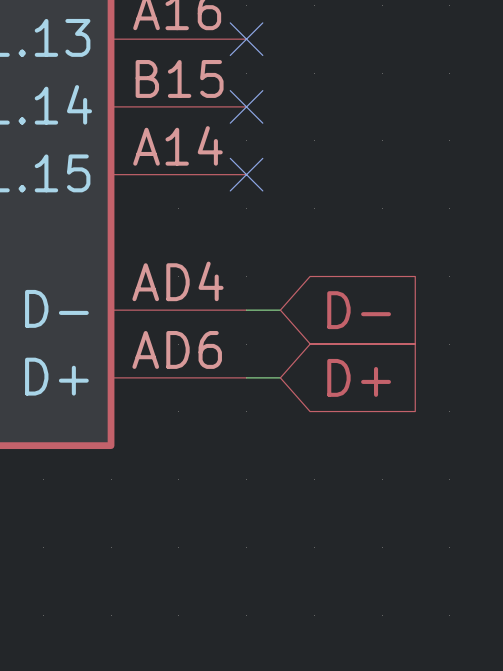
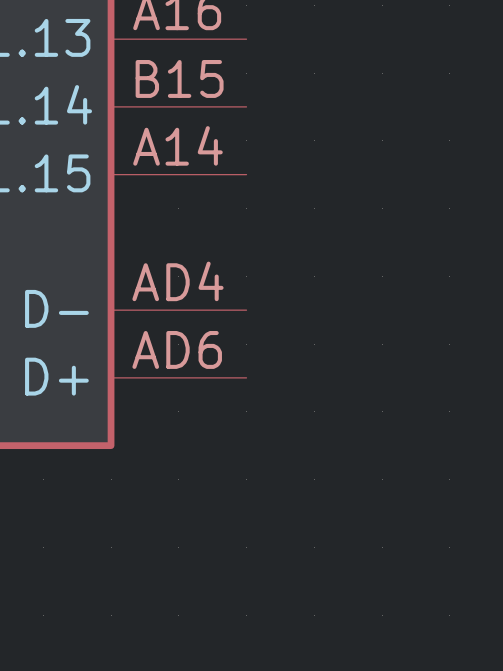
no-connect mark: (246, 39) -> none
no-connect mark: (246, 106) -> none
no-connect mark: (246, 174) -> none
wire: (246, 310) (280, 310) -> none
global label: D- (359, 310) -> none
wire: (246, 377) (280, 377) -> none
global label: D+ (359, 377) -> none

